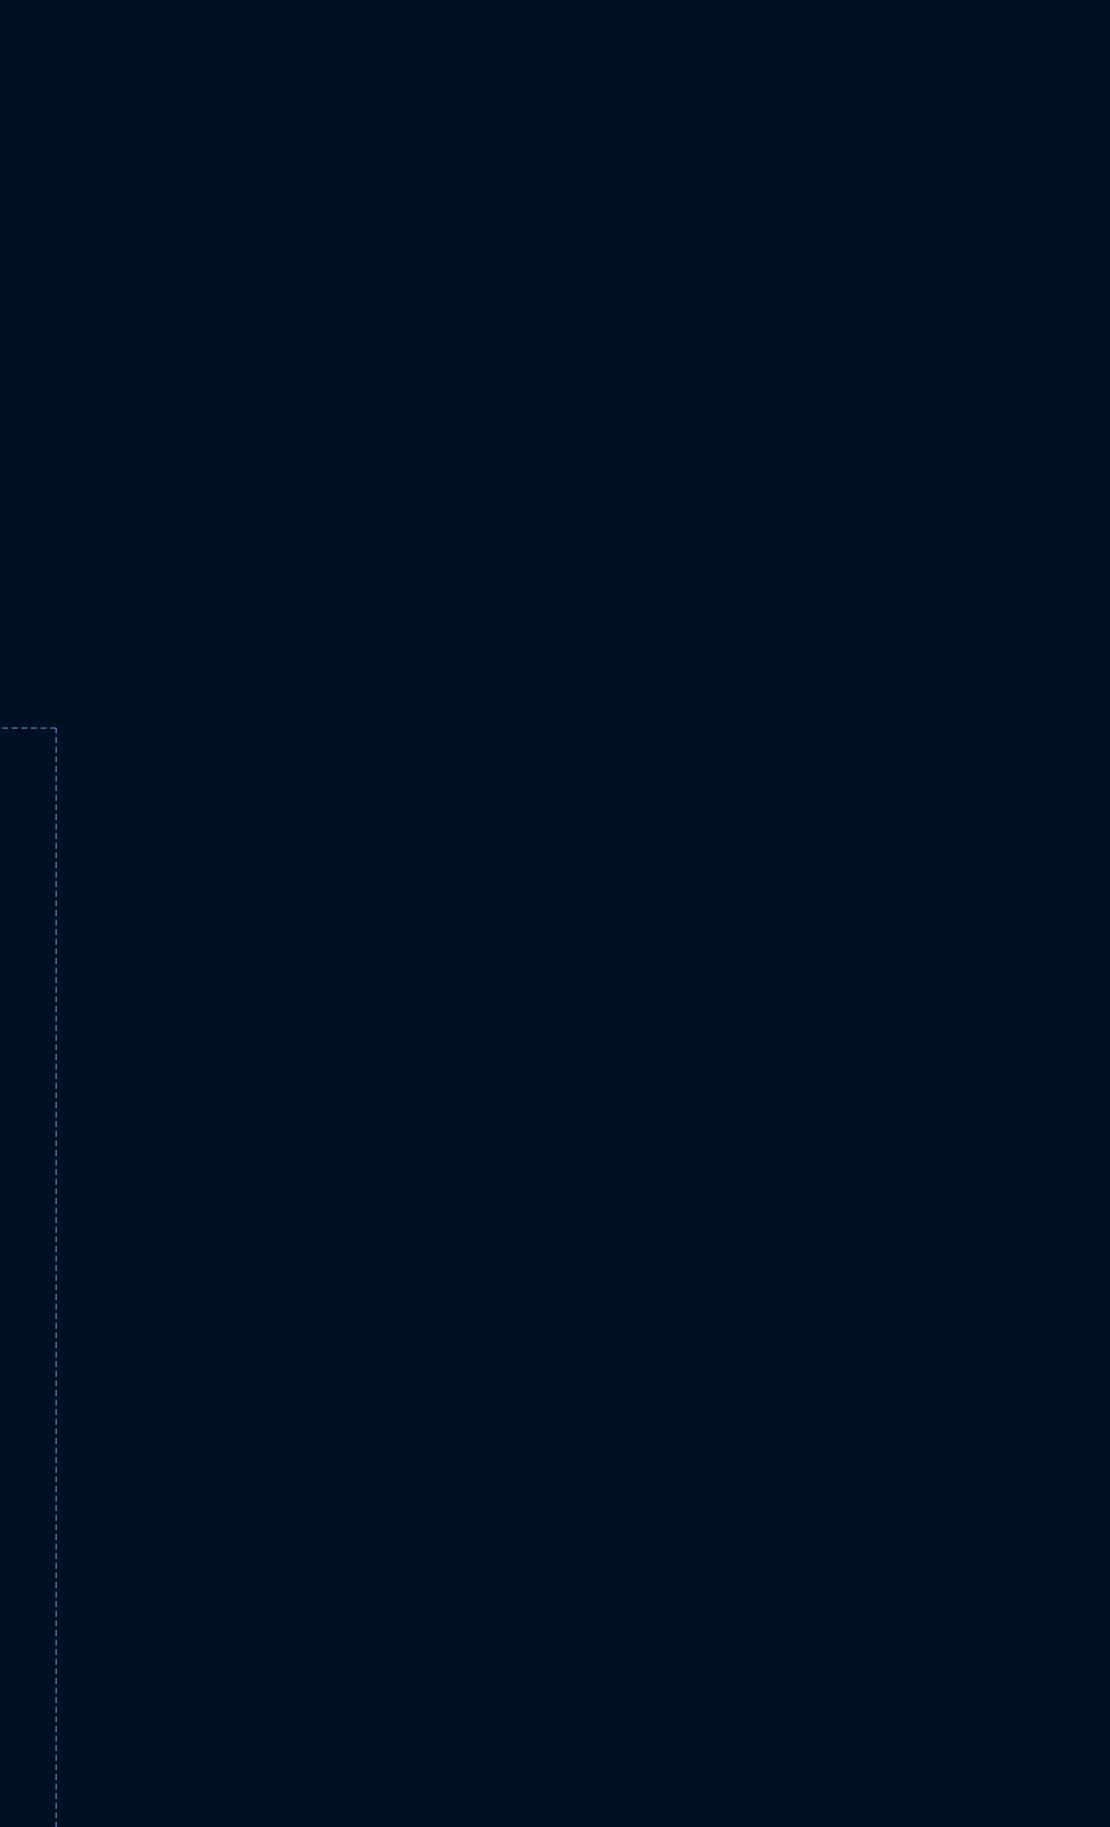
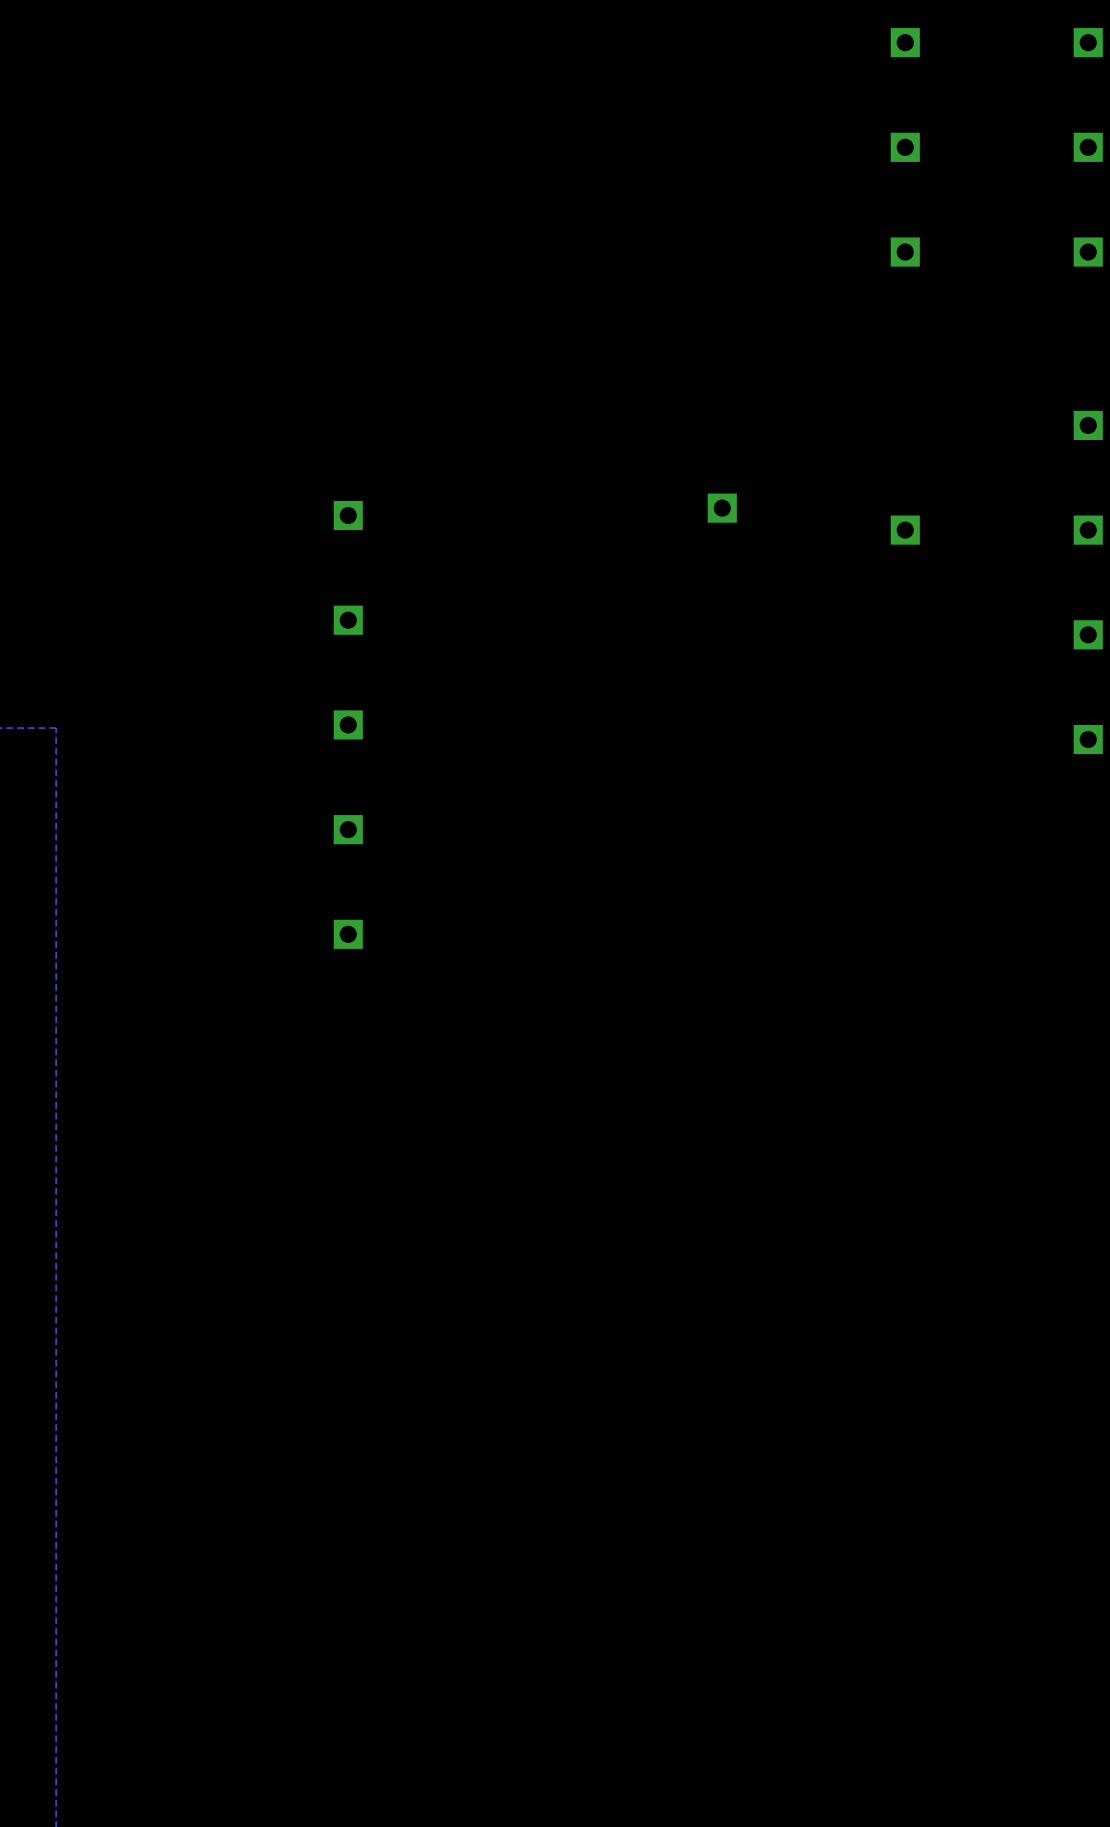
part: none -> (905, 42)
part: none -> (1088, 42)
part: none -> (905, 147)
part: none -> (1088, 147)
part: none -> (905, 252)
part: none -> (1088, 252)
part: none -> (1088, 425)
part: none -> (722, 508)
part: none -> (348, 515)
part: none -> (905, 530)
part: none -> (1088, 530)
part: none -> (348, 620)
part: none -> (1088, 634)
part: none -> (348, 724)
part: none -> (1088, 739)
part: none -> (348, 829)
part: none -> (348, 934)

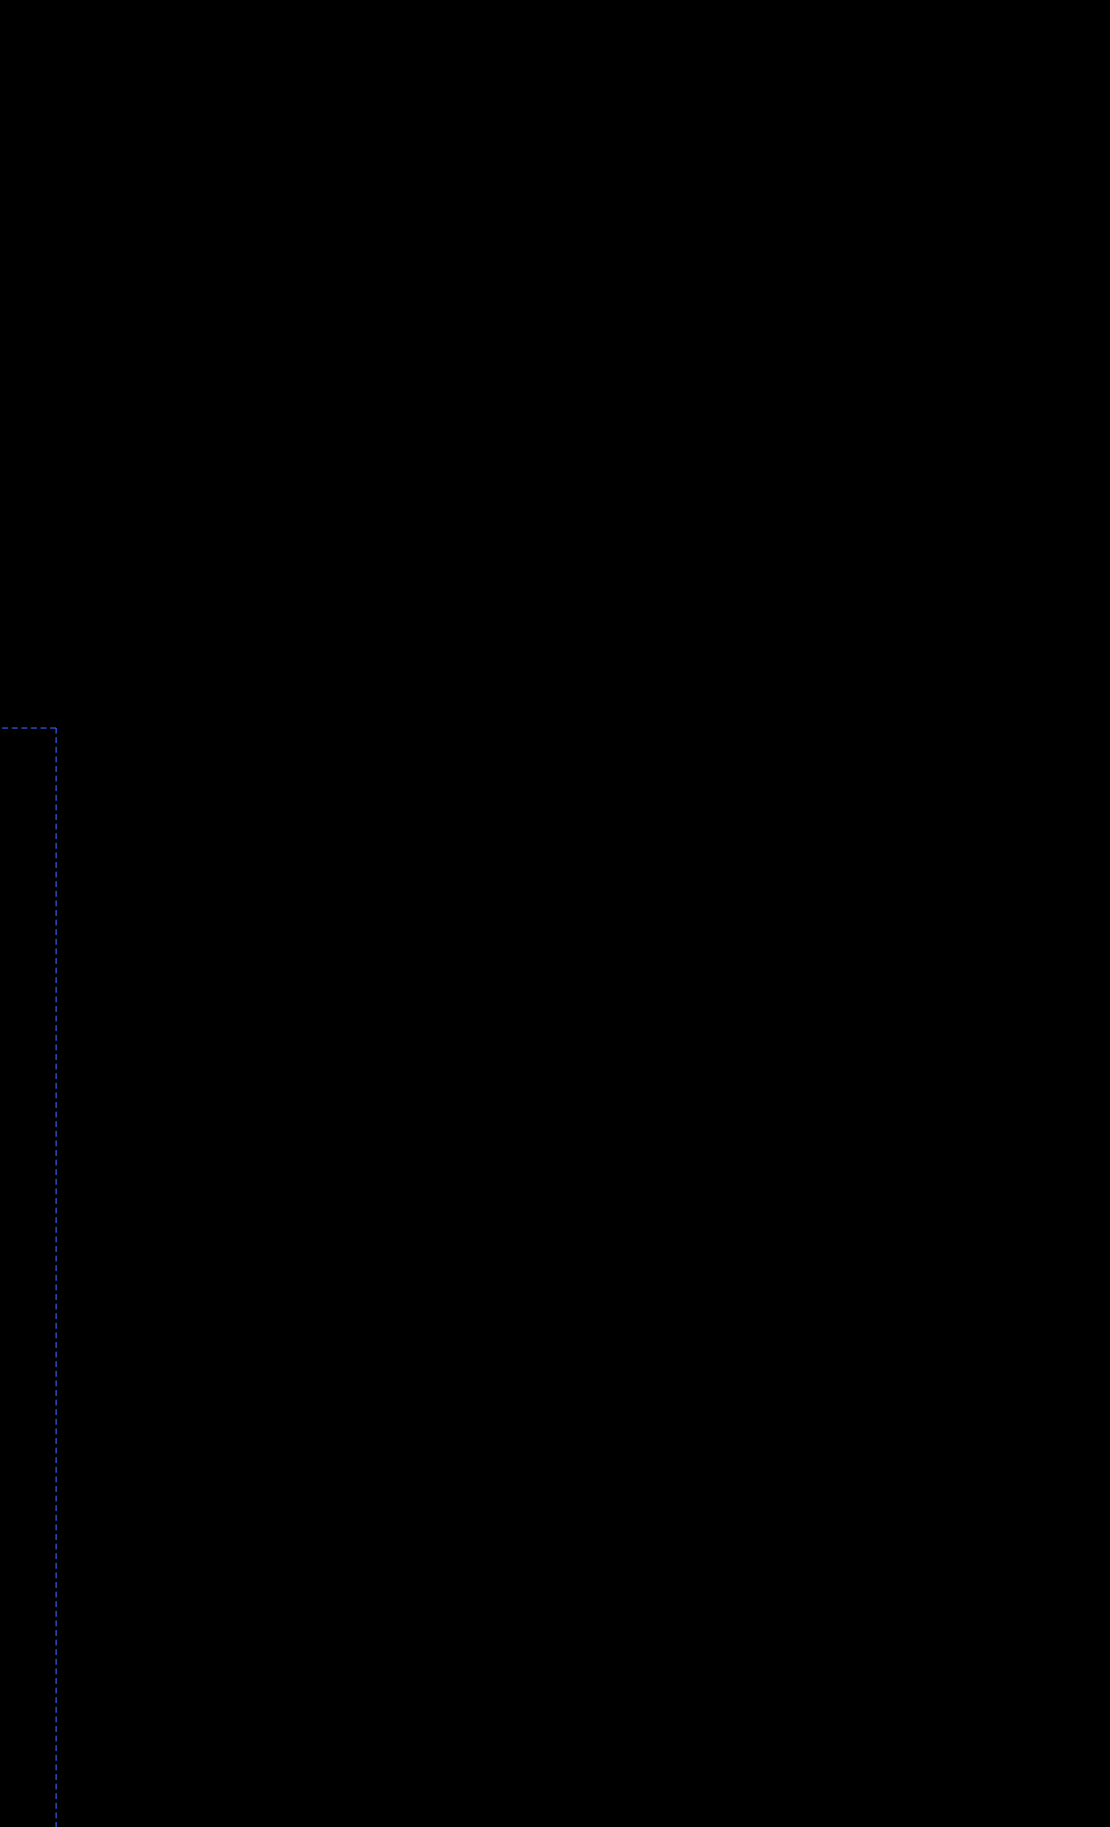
part: (905, 42) -> none
part: (1088, 42) -> none
part: (905, 147) -> none
part: (1088, 147) -> none
part: (905, 252) -> none
part: (1088, 252) -> none
part: (1088, 425) -> none
part: (722, 508) -> none
part: (348, 515) -> none
part: (905, 530) -> none
part: (1088, 530) -> none
part: (348, 620) -> none
part: (1088, 634) -> none
part: (348, 724) -> none
part: (1088, 739) -> none
part: (348, 829) -> none
part: (348, 934) -> none

